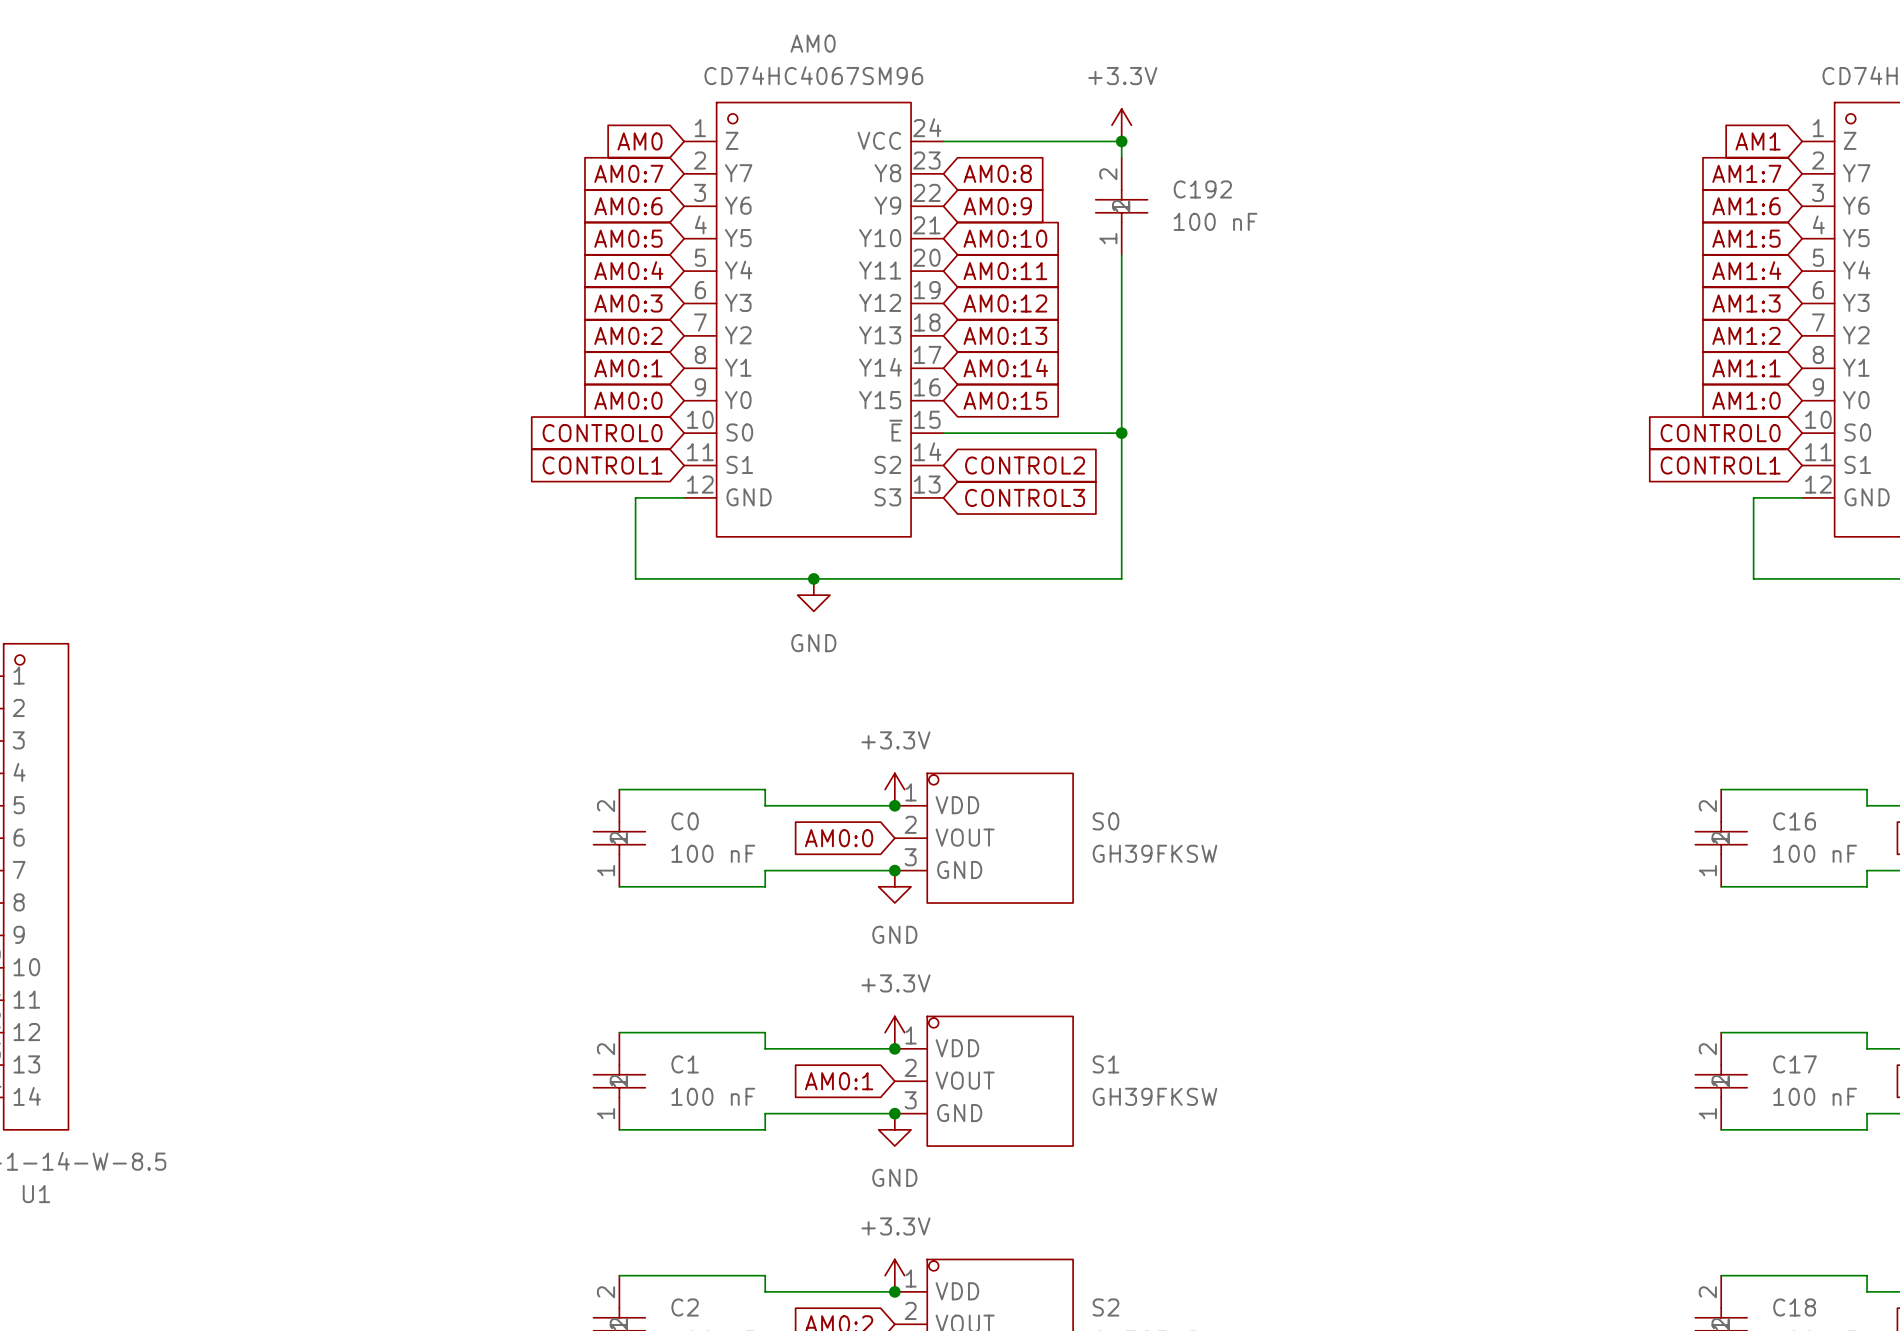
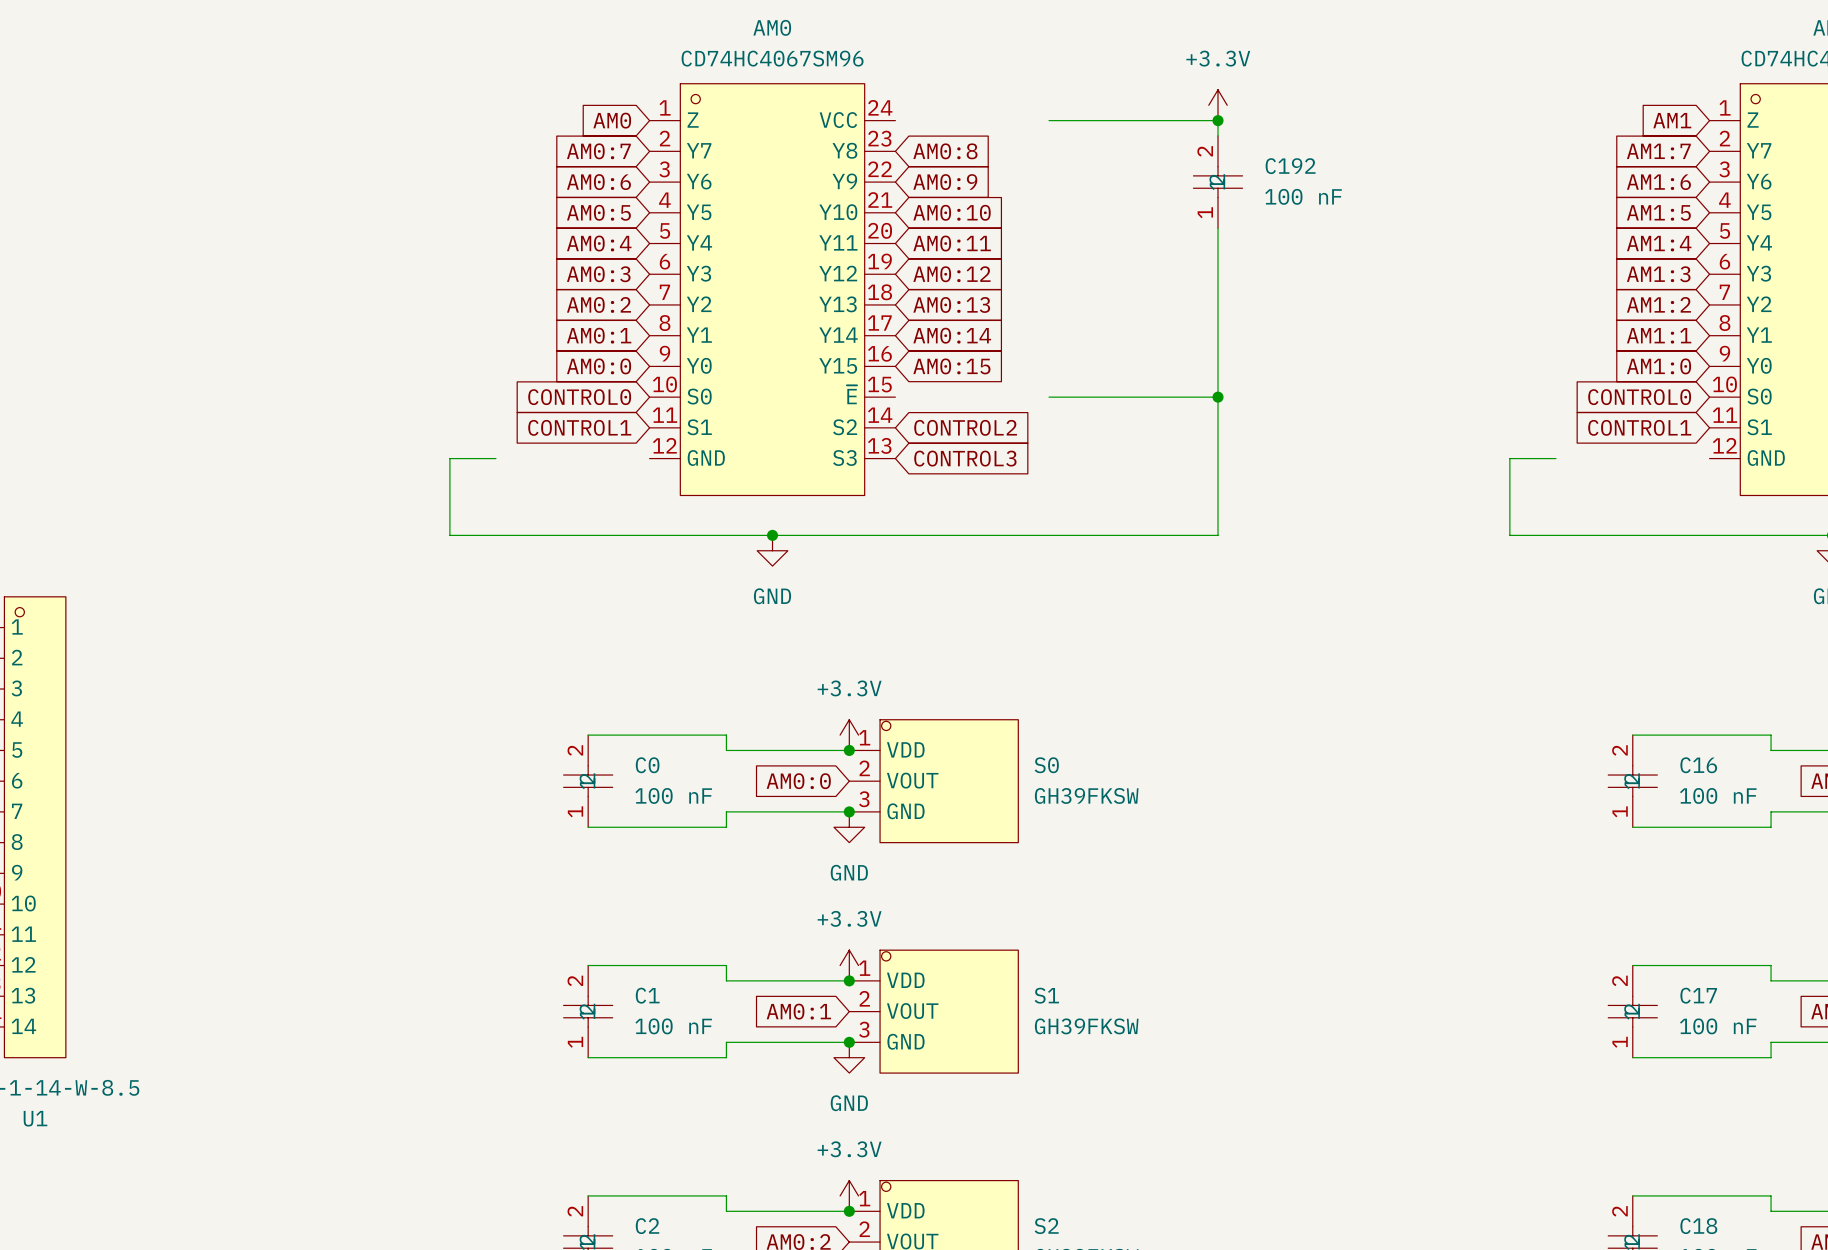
power symbol position: +3.3V (1121, 125) -> +3.3V (1218, 105)
wire: (943, 141) (1105, 141) -> none
wire: (1121, 141) (1121, 157) -> (1064, 120) (1218, 120) (1218, 135)
junction: (1121, 141) -> none
junction: none -> (1218, 120)
C192 position: (1121, 206) -> (1218, 182)
wire: (1121, 254) (1121, 578) -> (1218, 228) (1218, 535) (1064, 535)
wire: (943, 433) (1105, 433) -> (1064, 397) (1218, 397)
junction: (1121, 433) -> none
junction: none -> (1218, 397)
wire: (684, 497) (635, 497) (635, 578) -> (495, 458) (449, 458) (449, 535) (603, 535)
wire: (1802, 497) (1753, 497) (1753, 578) -> (1555, 458) (1509, 458) (1509, 535) (1663, 535)

